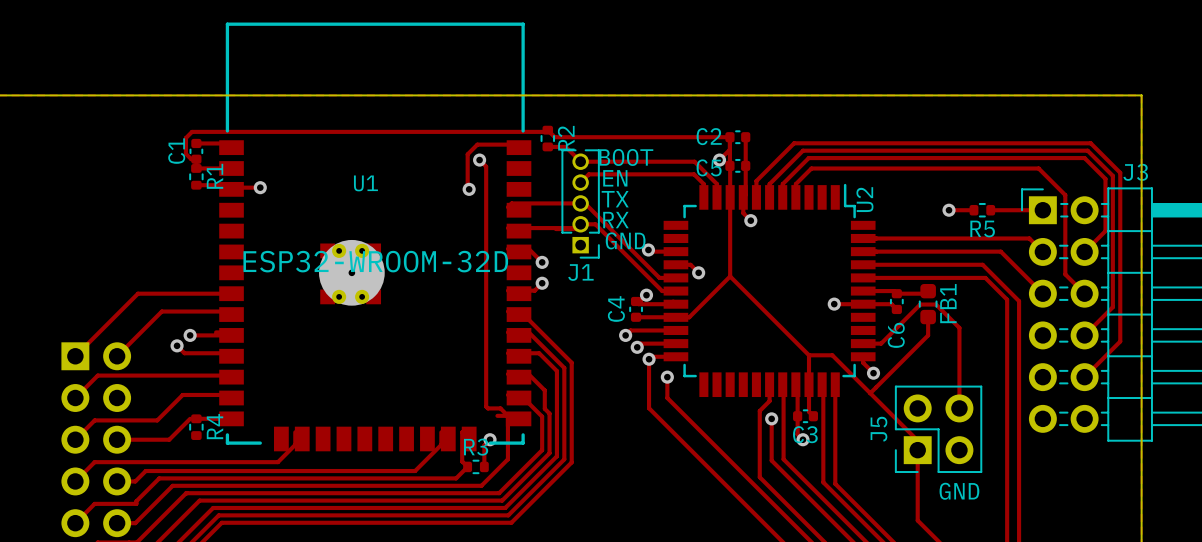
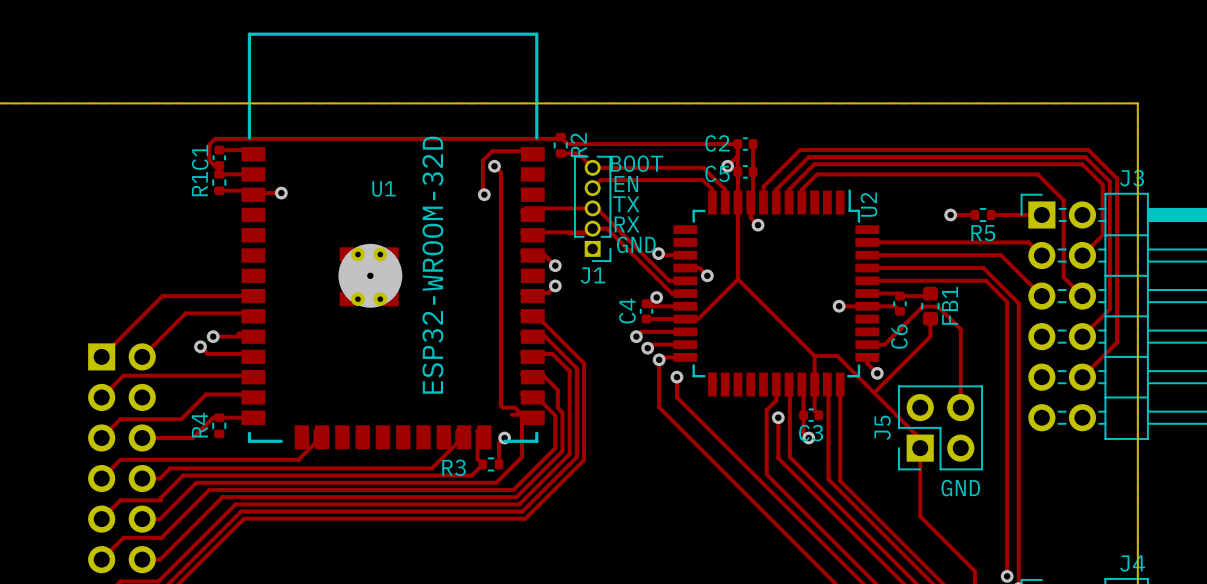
R1 name position: R1 (214, 176) -> R1 (199, 184)
U1 value rotation: 0° (375, 261) -> 90° counterclockwise (432, 265)
R4 name position: R4 (214, 426) -> R4 (199, 425)
R3 name position: R3 (476, 447) -> R3 (454, 467)

